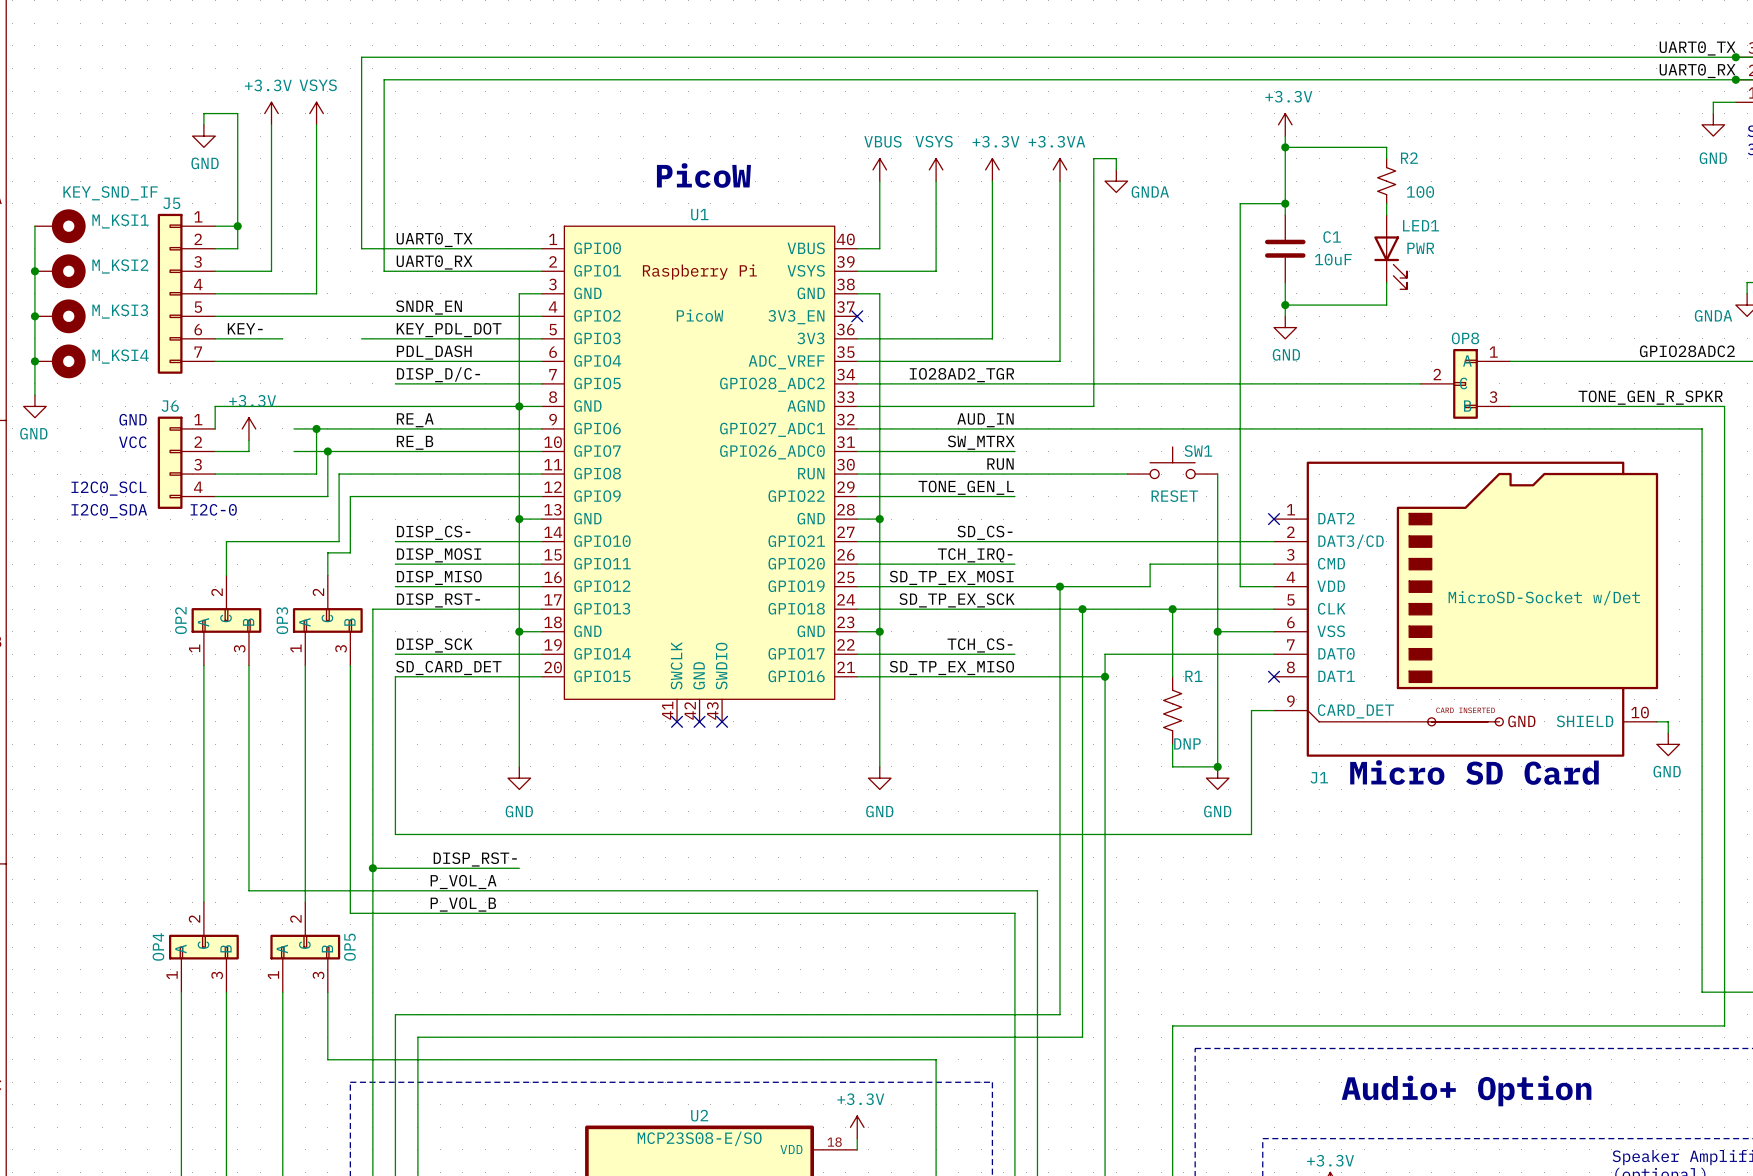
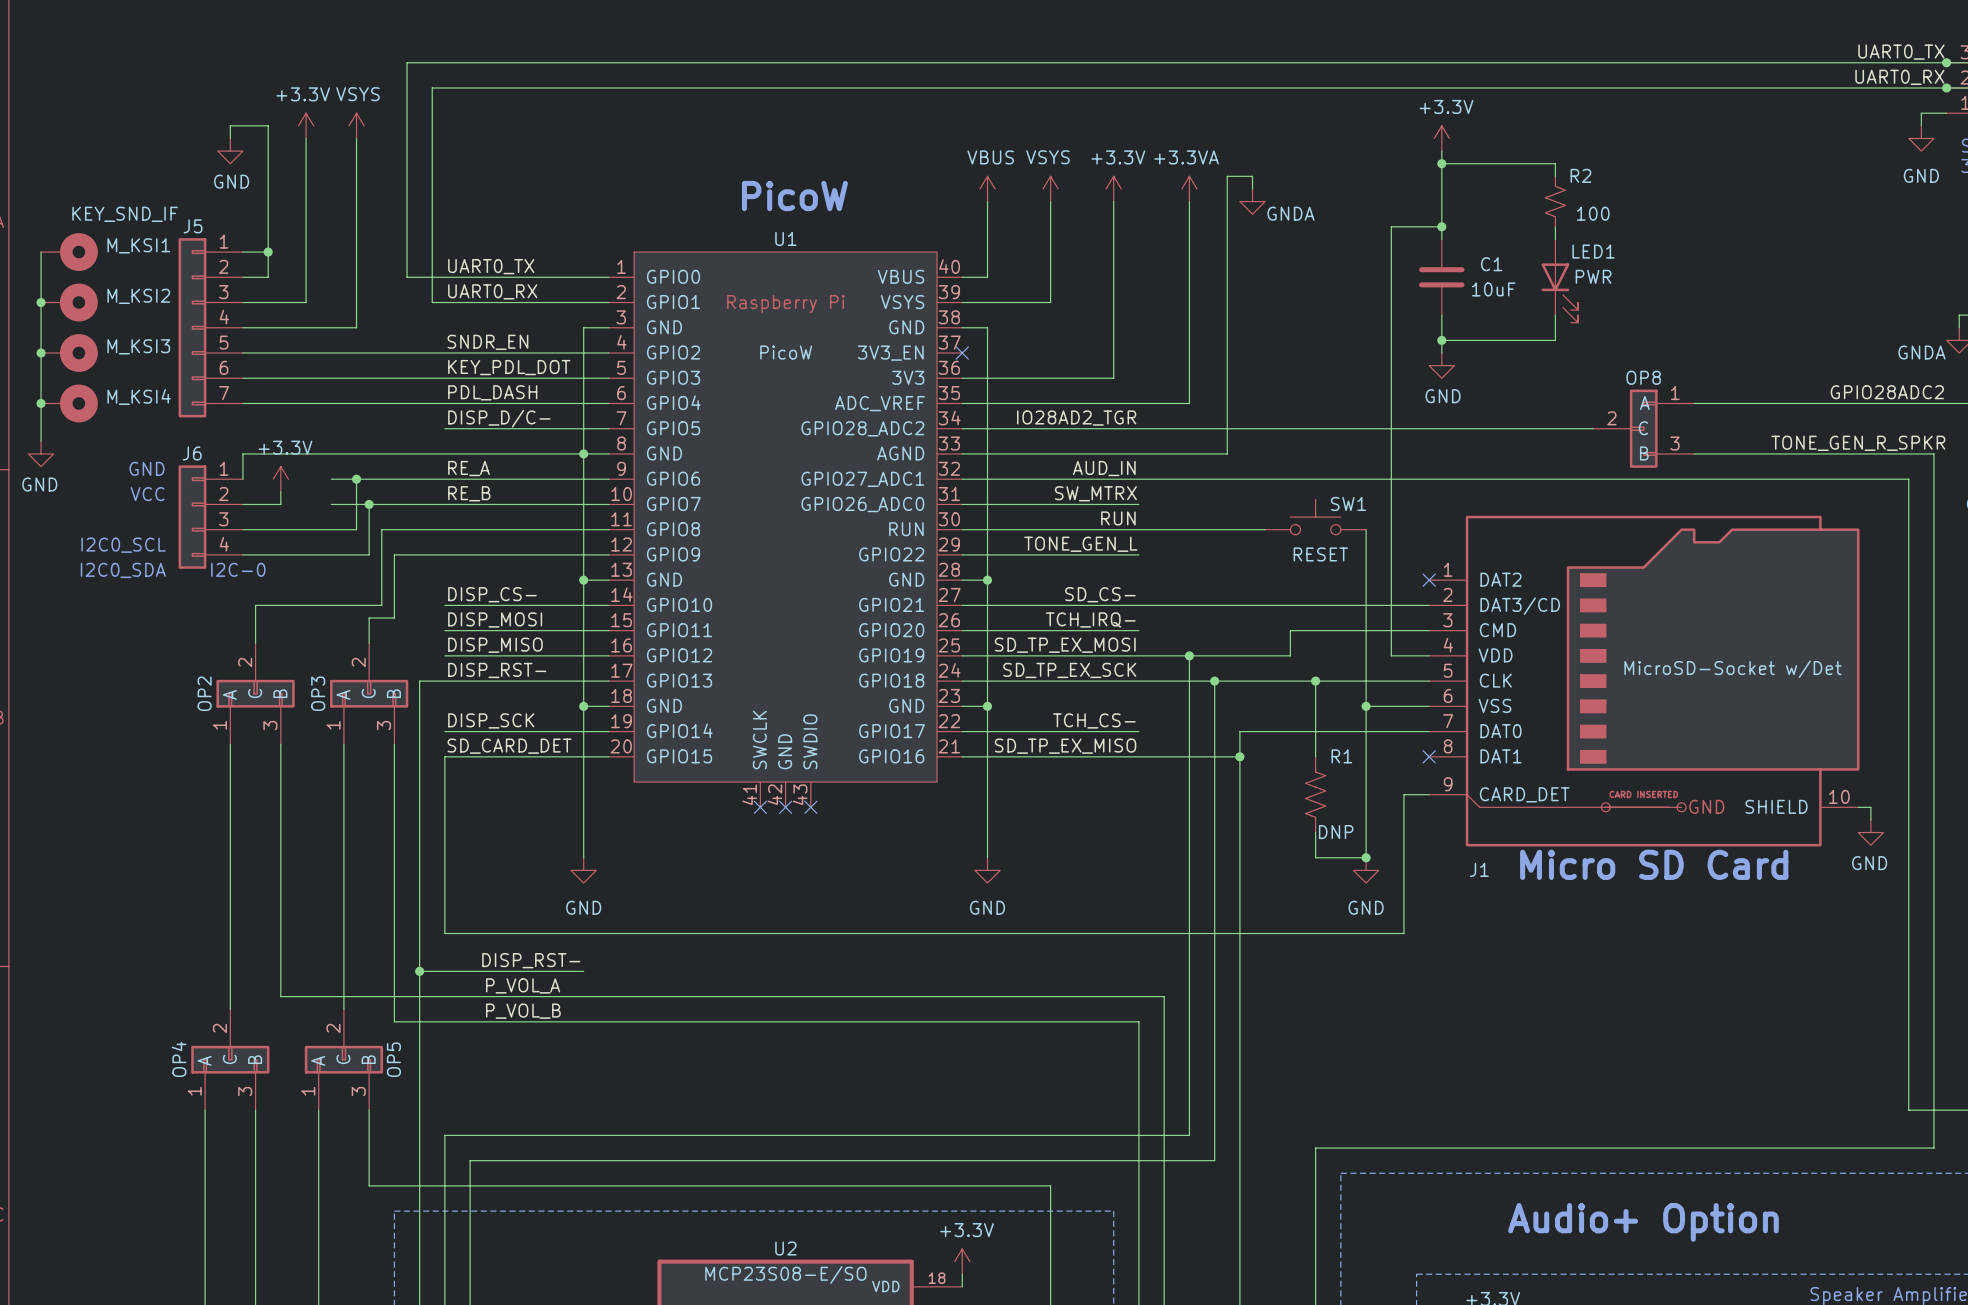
label: KEY- (245, 328) -> none
wire: none -> (318, 378) (407, 378)

